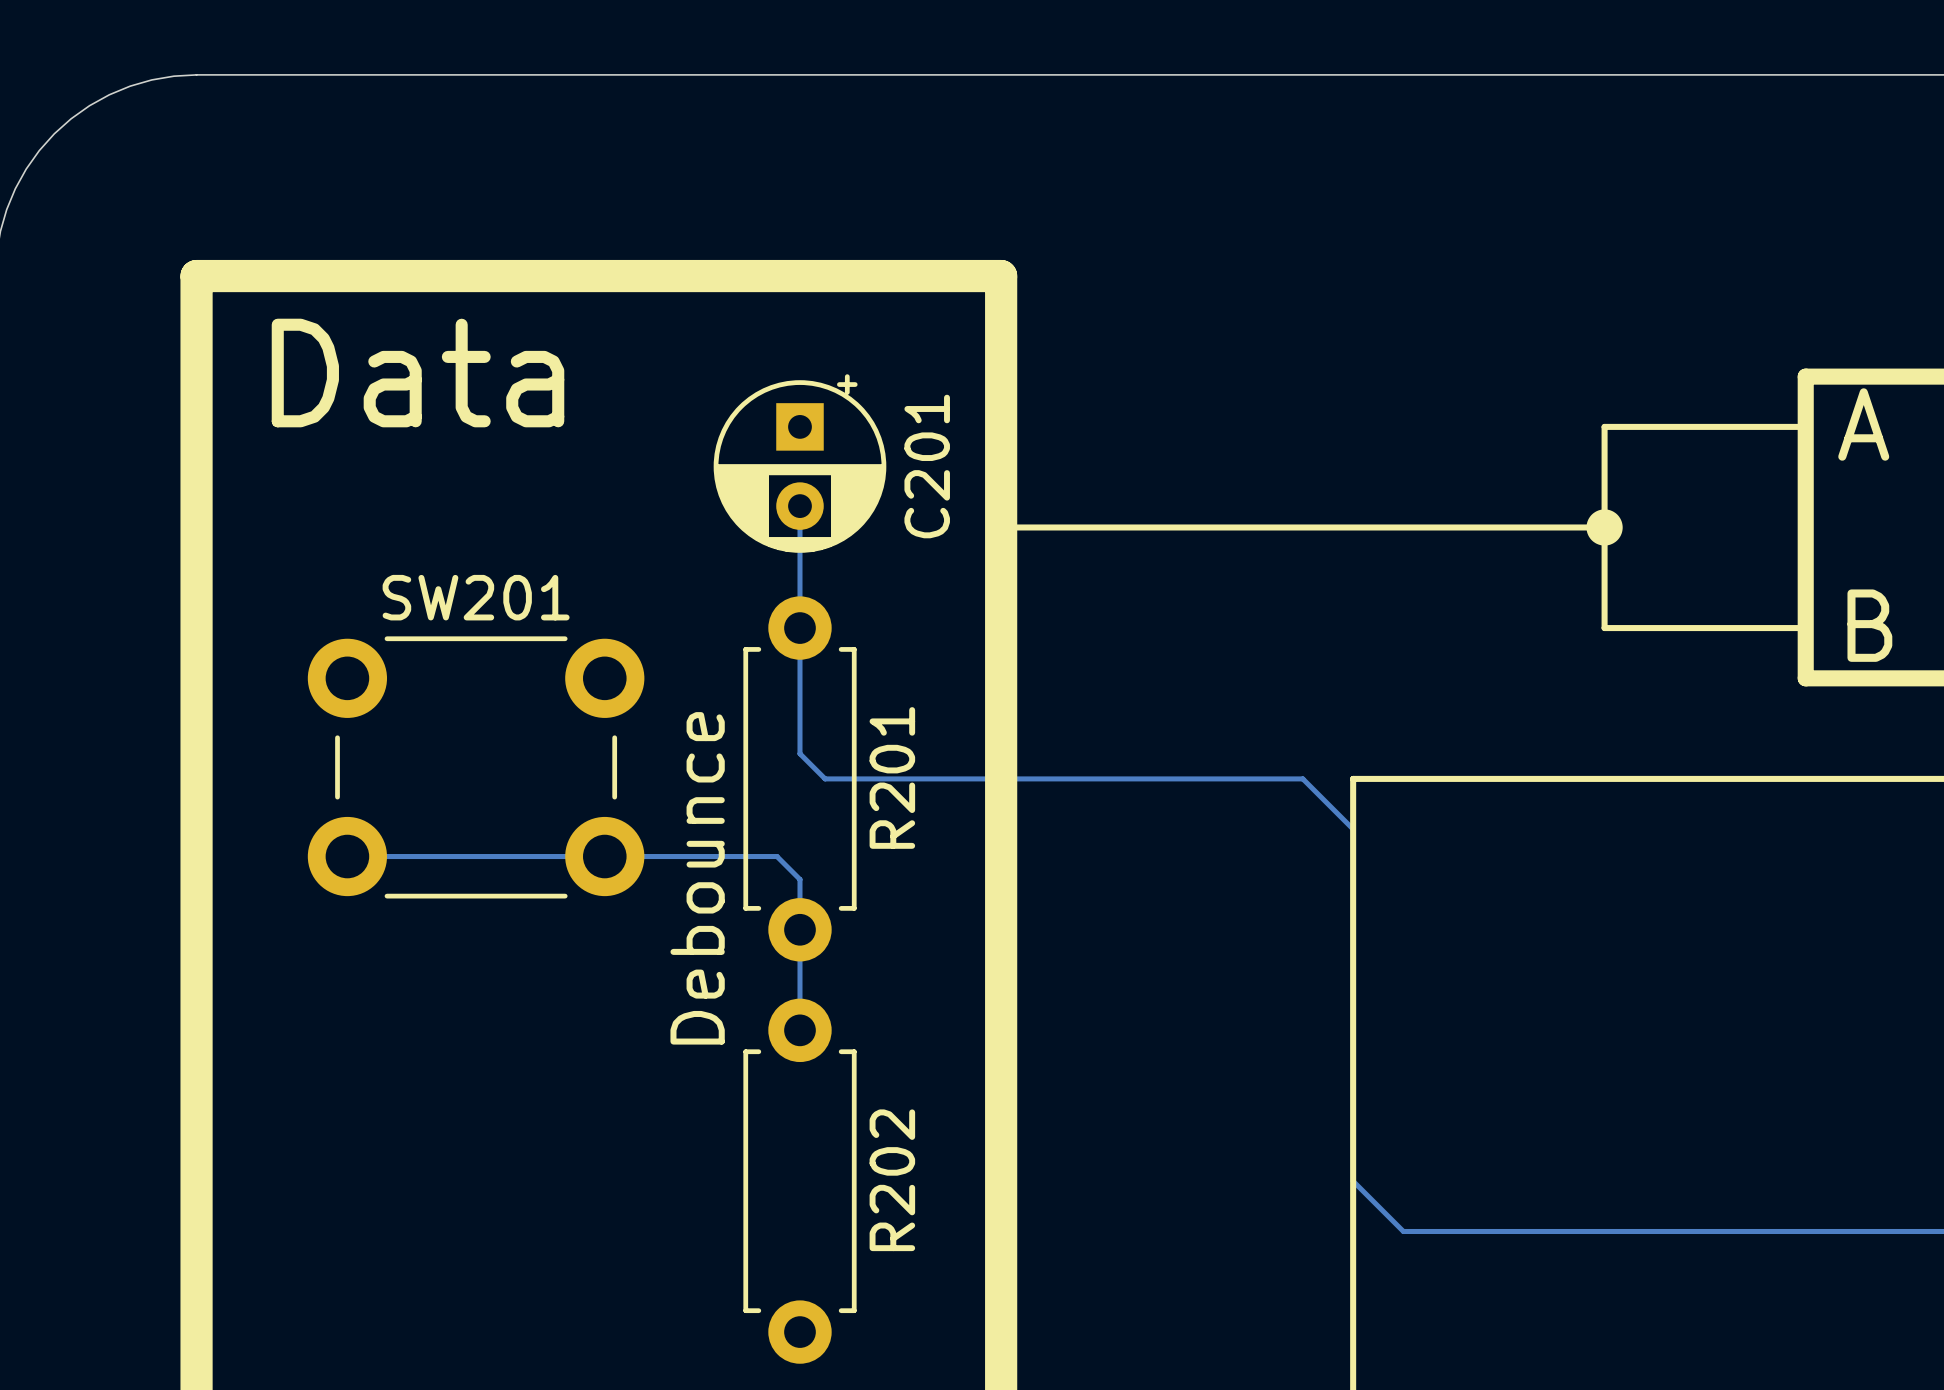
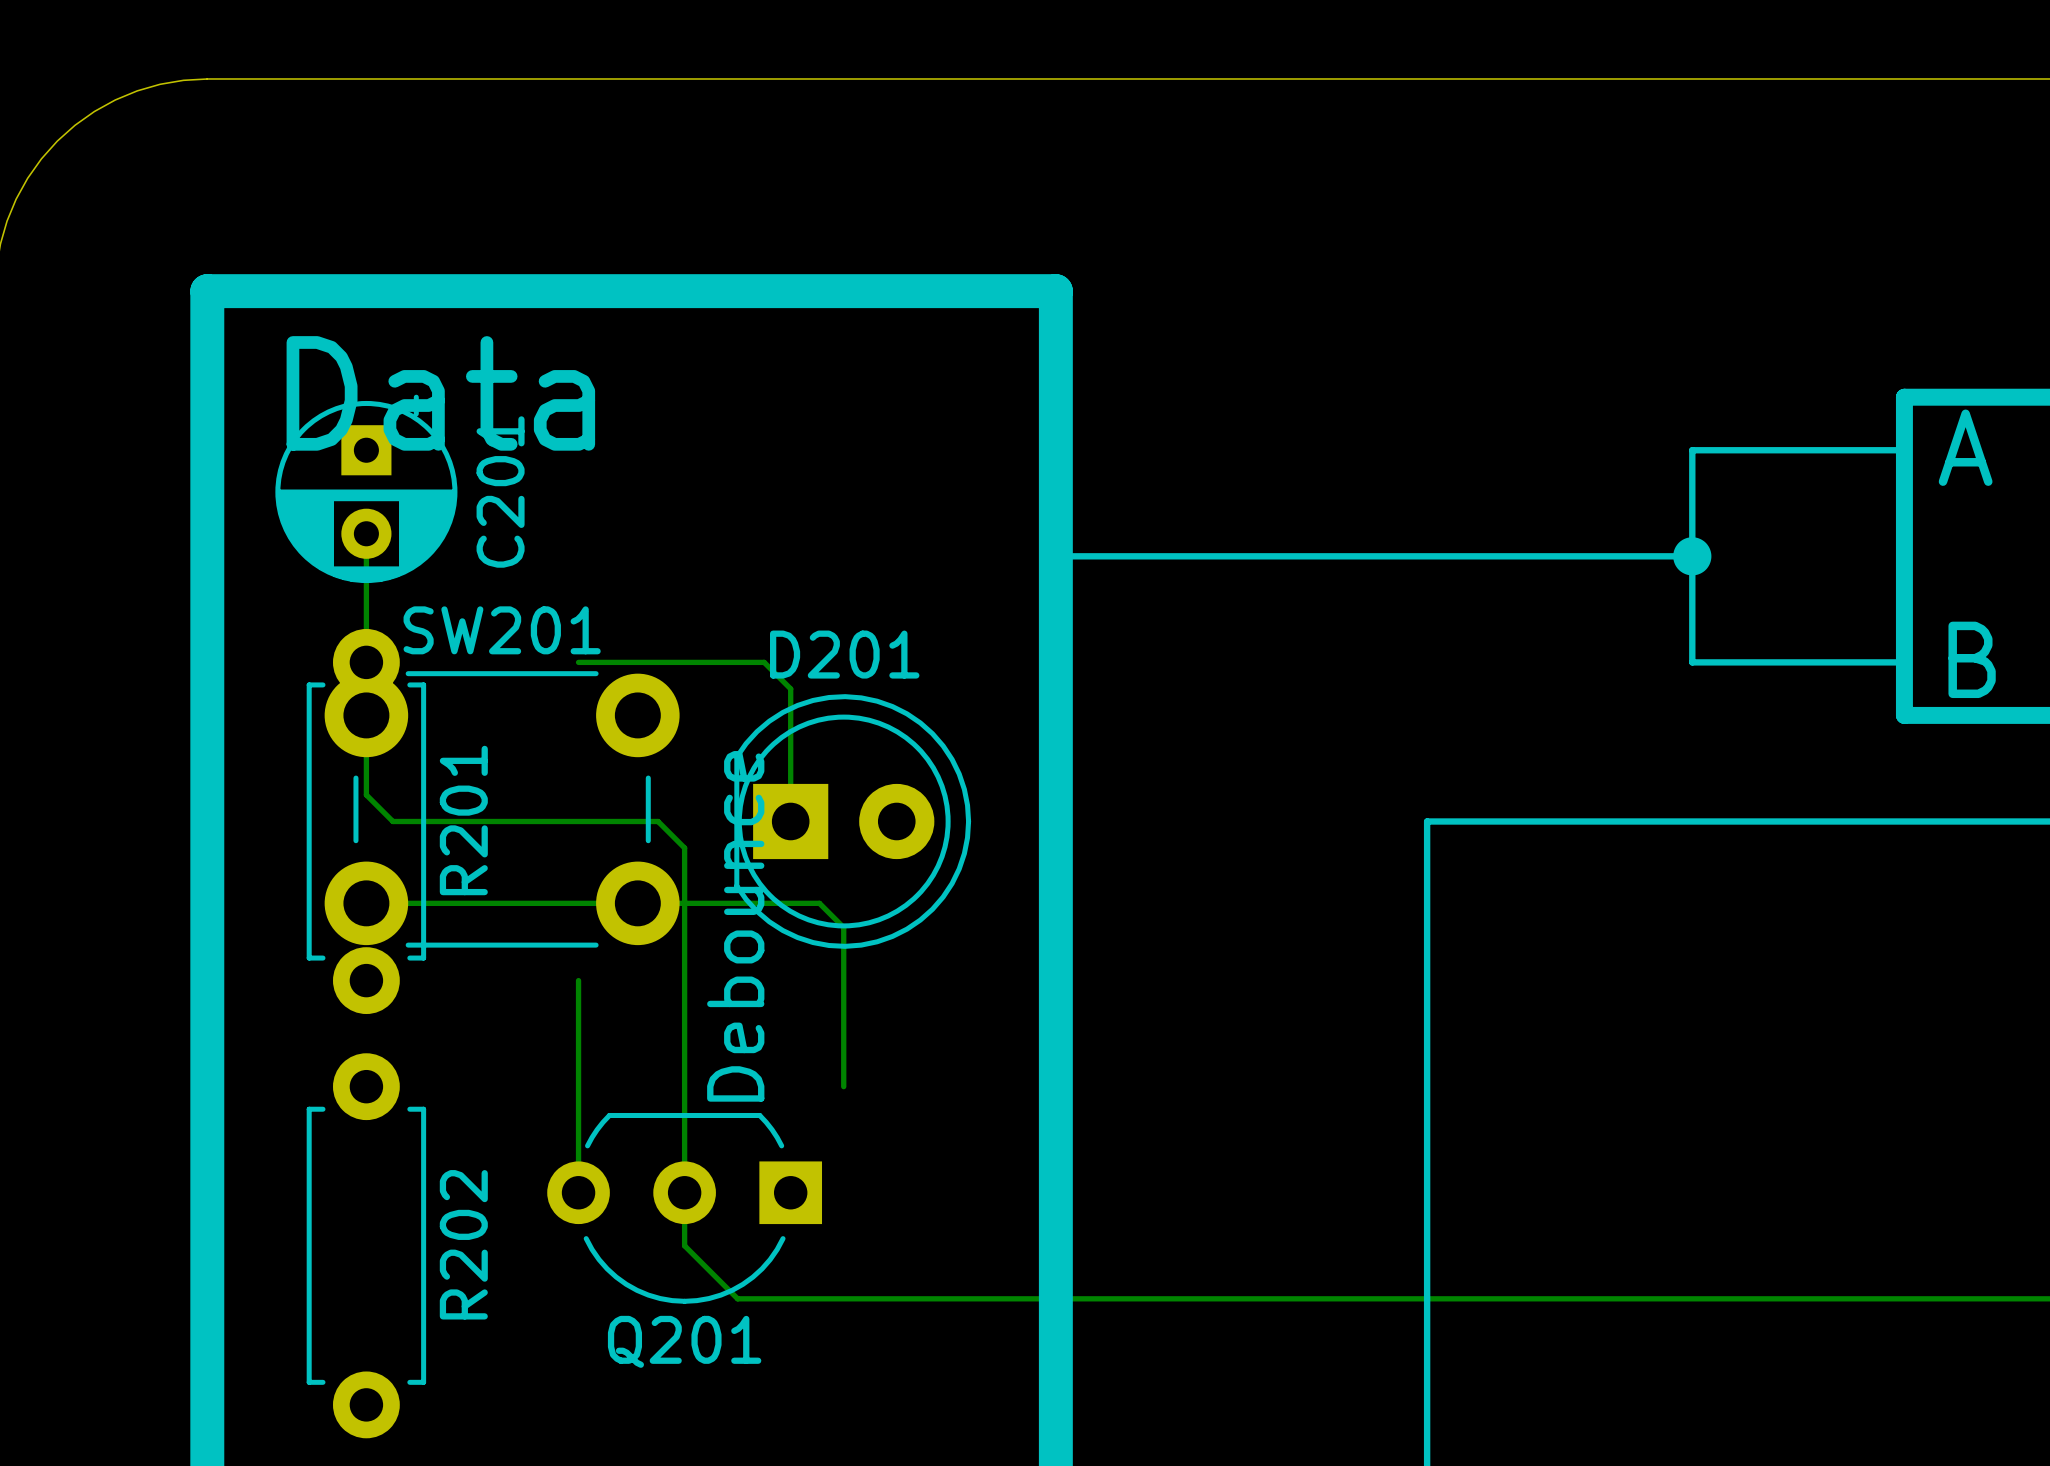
C201 position: (799, 463) -> (366, 488)
bottom track: (799, 506) (799, 753) (825, 778) (1302, 778) (1353, 829) (1353, 1181) (1403, 1231) -> (366, 533) (366, 794) (392, 821) (658, 821) (684, 848) (684, 1245) (737, 1298) (1480, 1298)
bottom track: none -> (578, 662) (764, 662) (790, 688) (790, 821)
R201 position: (799, 778) -> (366, 821)
D201: none -> (852, 821)
bottom track: none -> (578, 980) (578, 1192)
Q201: none -> (684, 1208)
R202 position: (799, 1181) -> (366, 1245)

